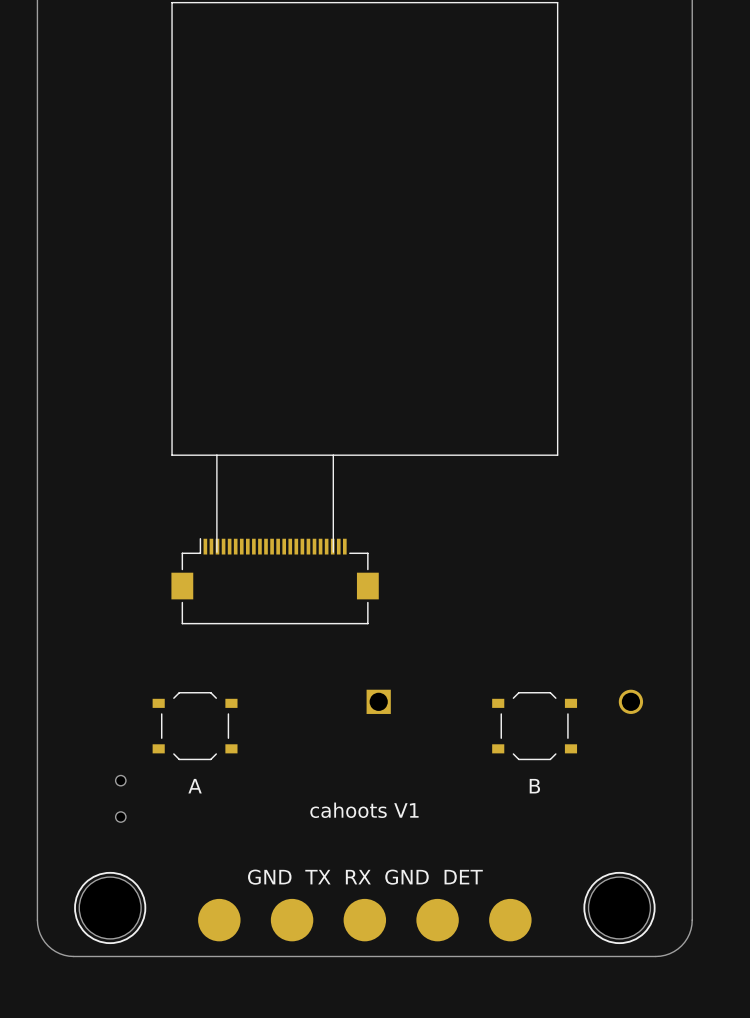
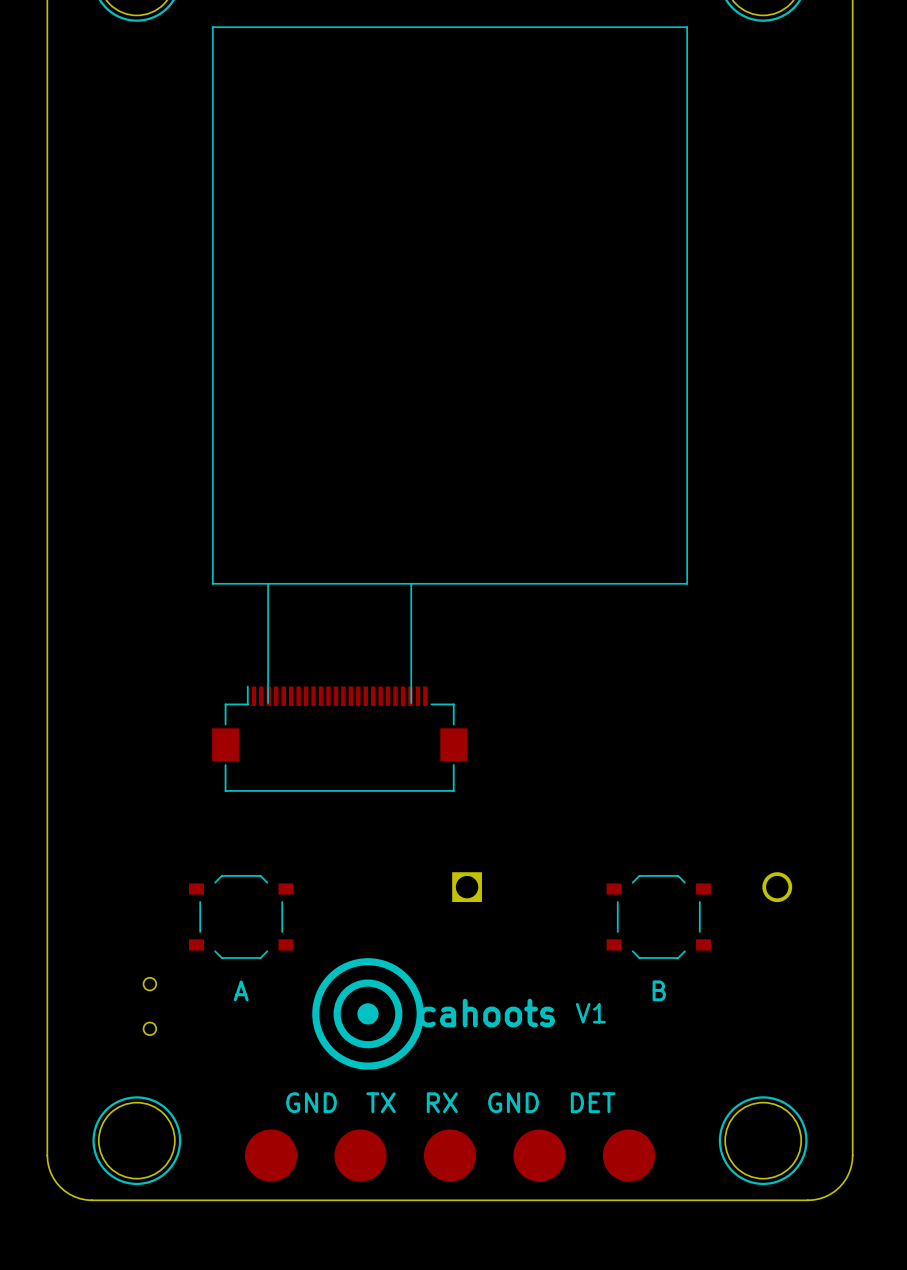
drawing: none -> [312, 958, 424, 1070]
text: none -> V1 (590, 1013)
text: cahoots V1 (364, 810) -> cahoots (487, 1013)

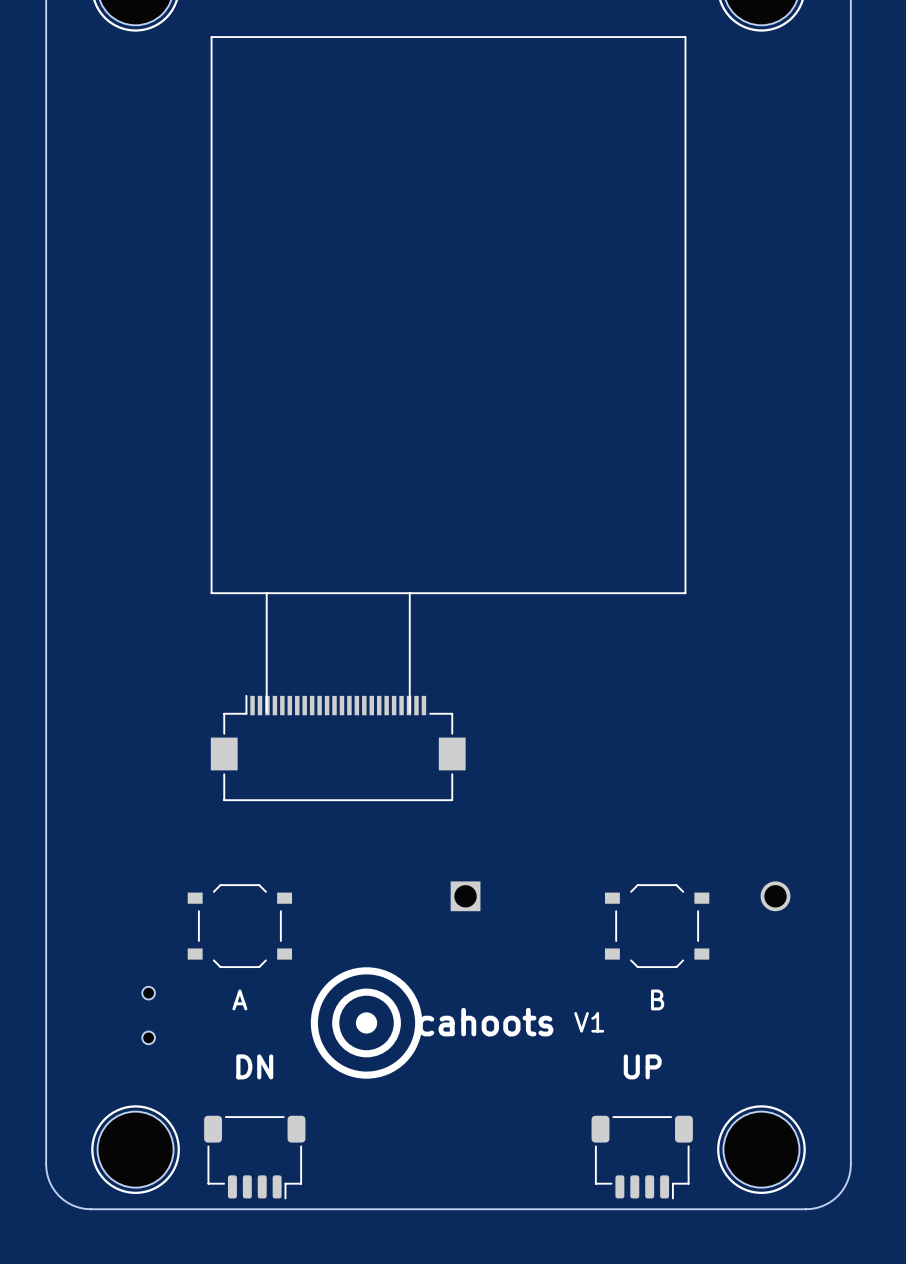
text: none -> DN (254, 1066)
text: none -> UP (642, 1066)
text: GND TX RX GND DET (450, 1102) -> none
part: none -> (254, 1157)
part: none -> (642, 1157)
part: (271, 1155) -> none
part: (360, 1155) -> none
part: (450, 1155) -> none
part: (539, 1155) -> none
part: (628, 1155) -> none

